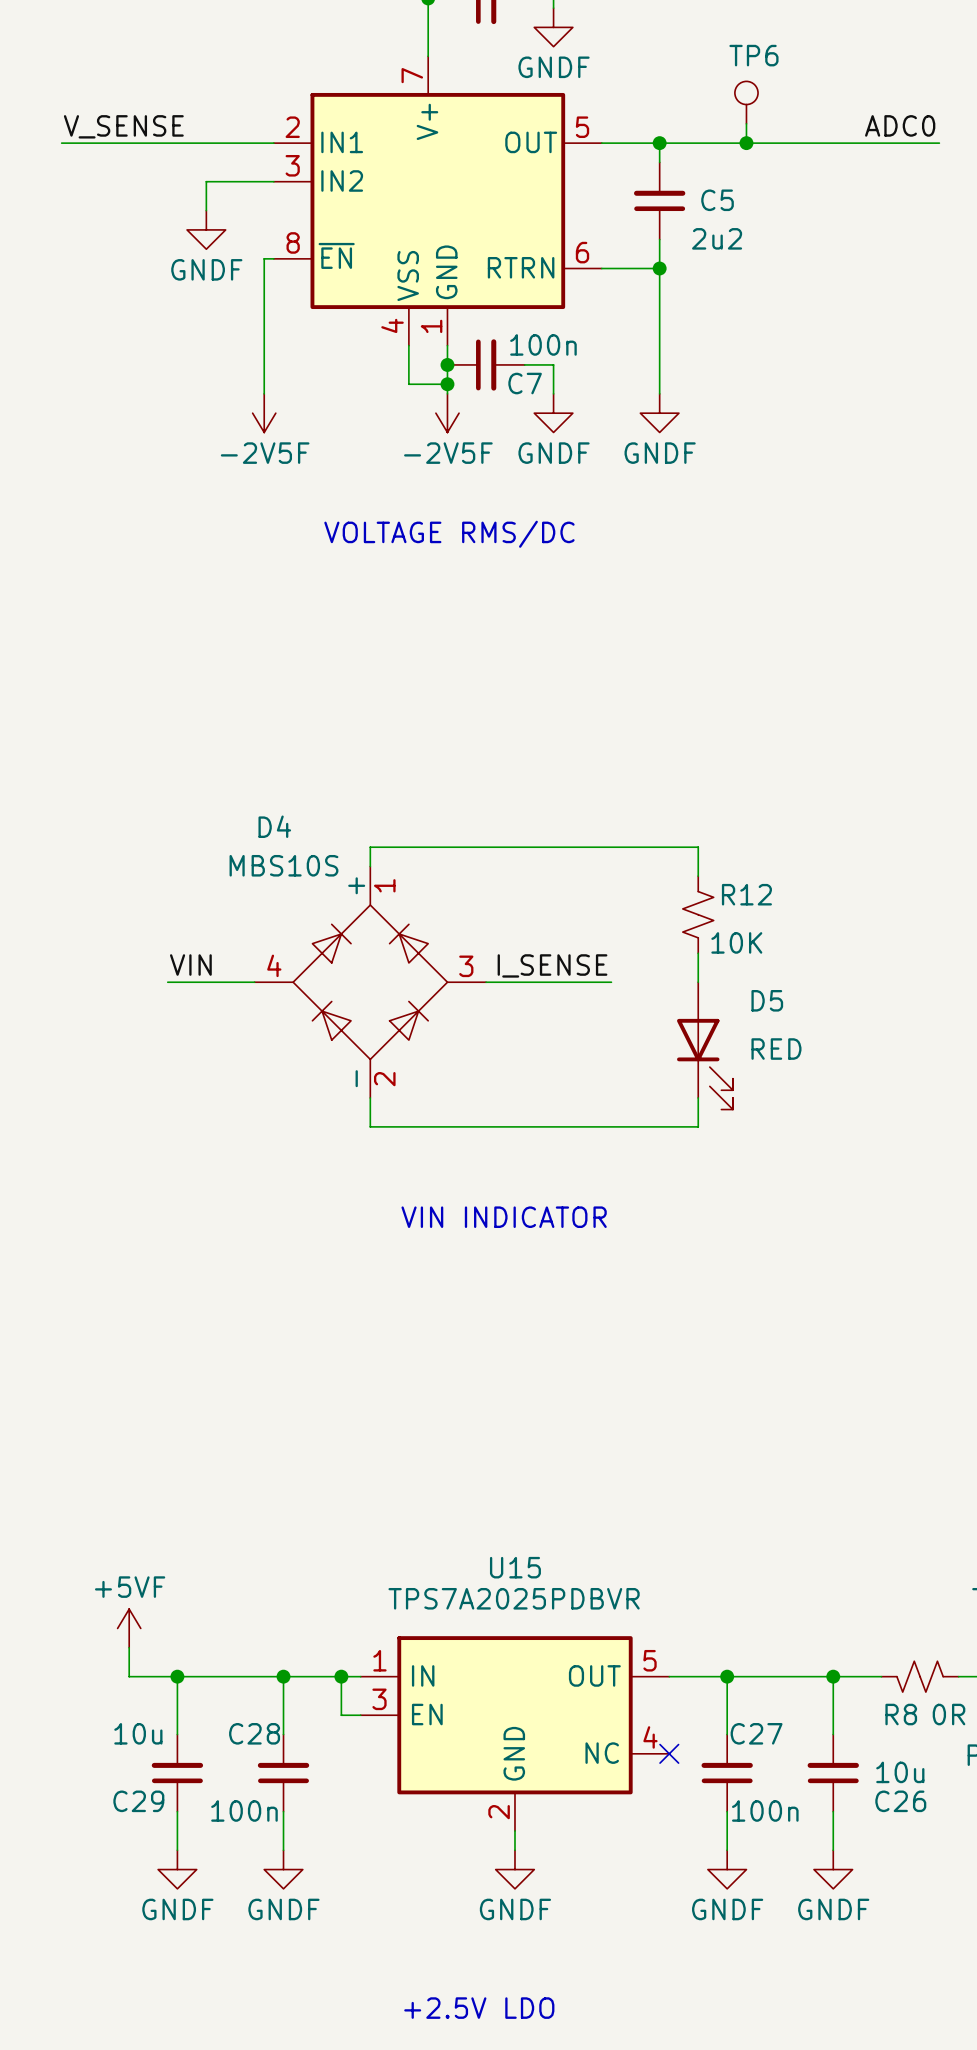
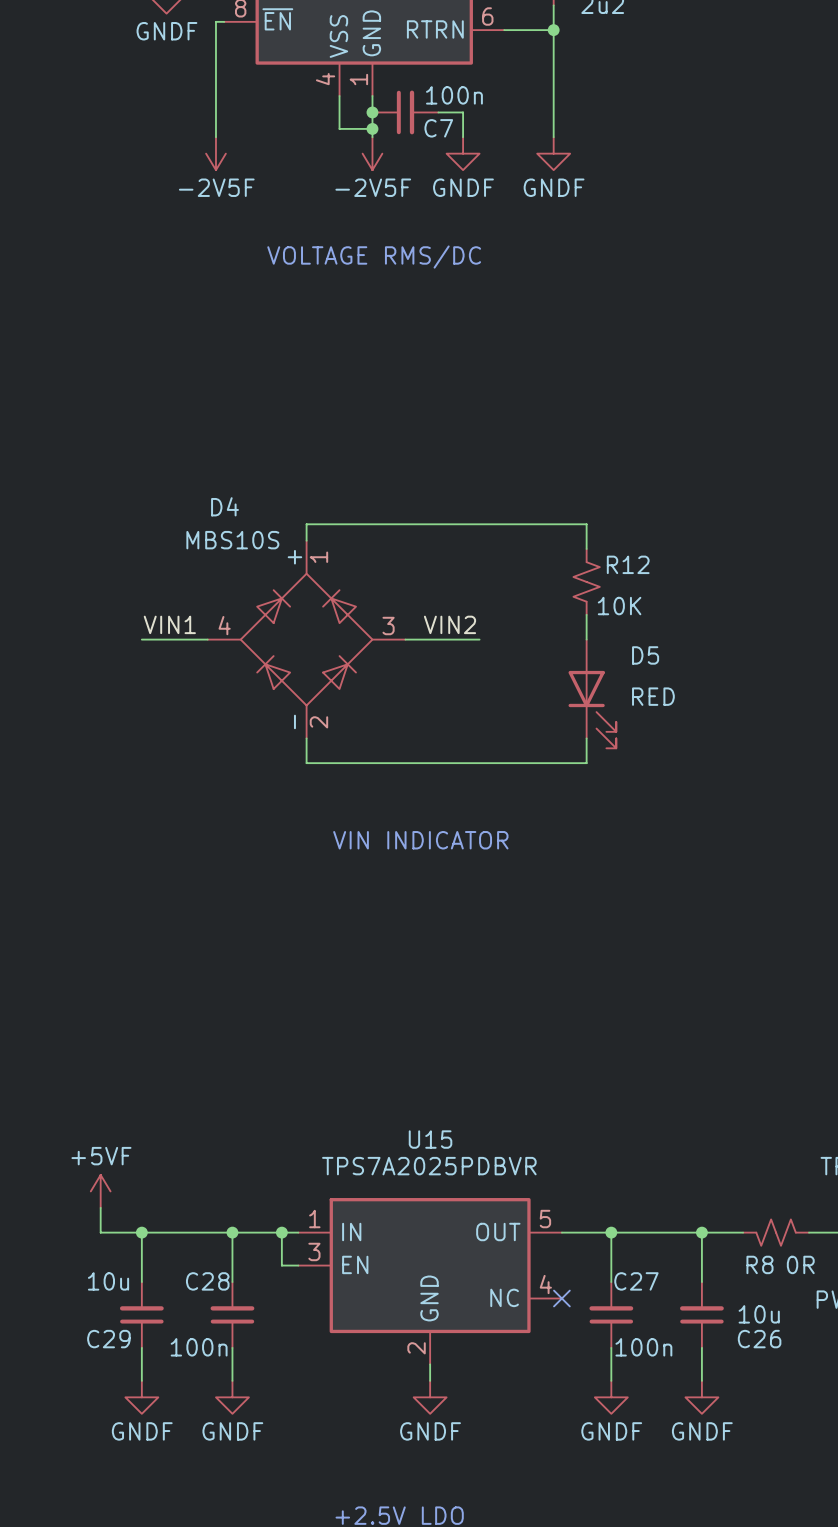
label: VIN (190, 965) -> VIN1 (169, 624)
label: none -> VIN2 (450, 624)
label: I_SENSE (552, 965) -> none
wire: (167, 982) (177, 982) -> none
wire: (572, 982) (611, 982) -> none

